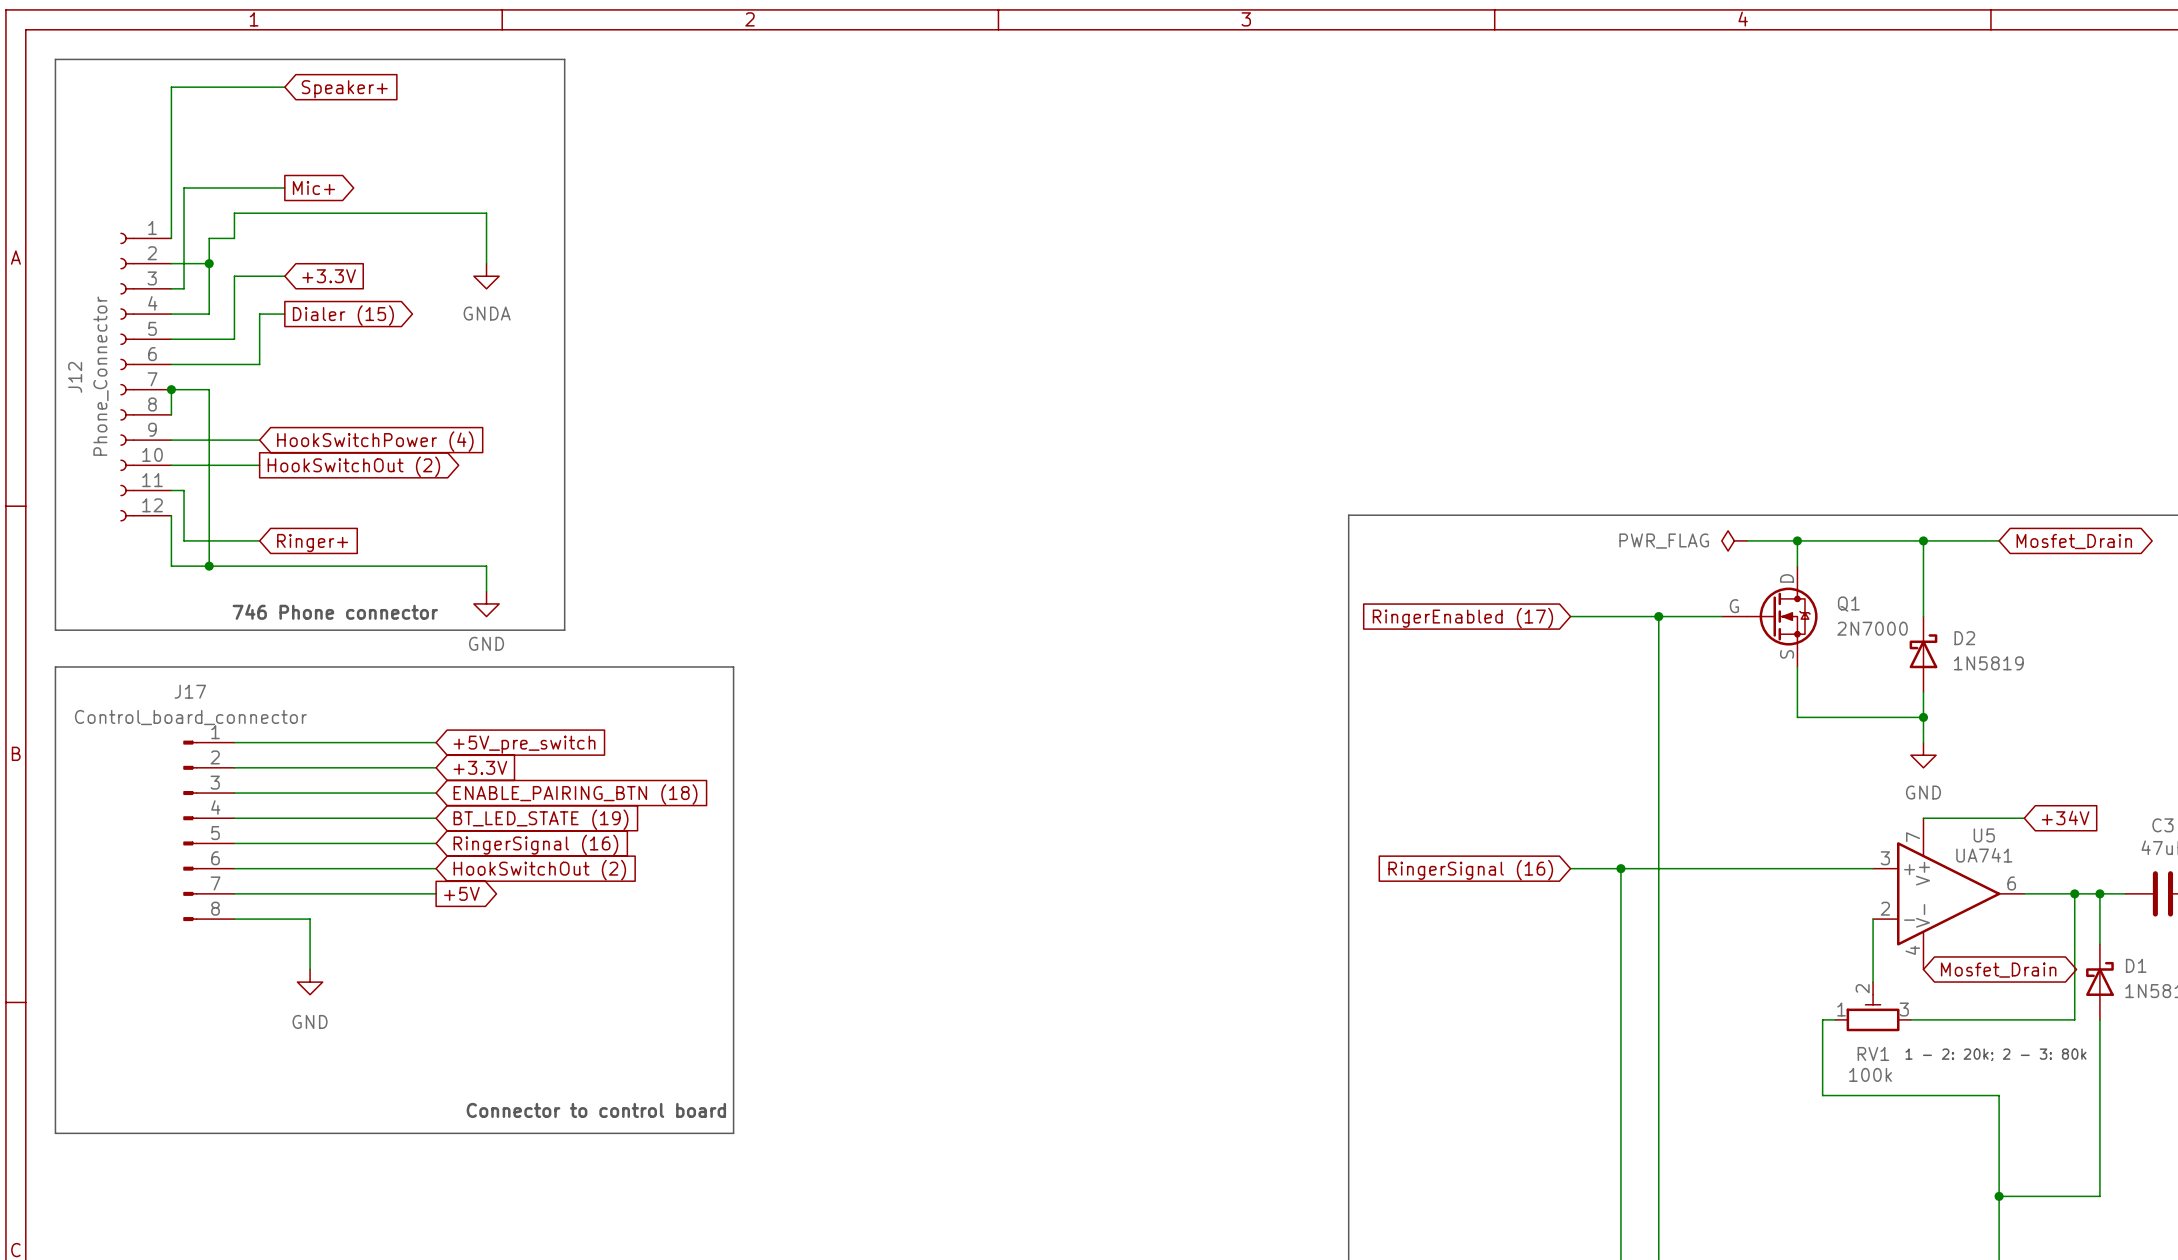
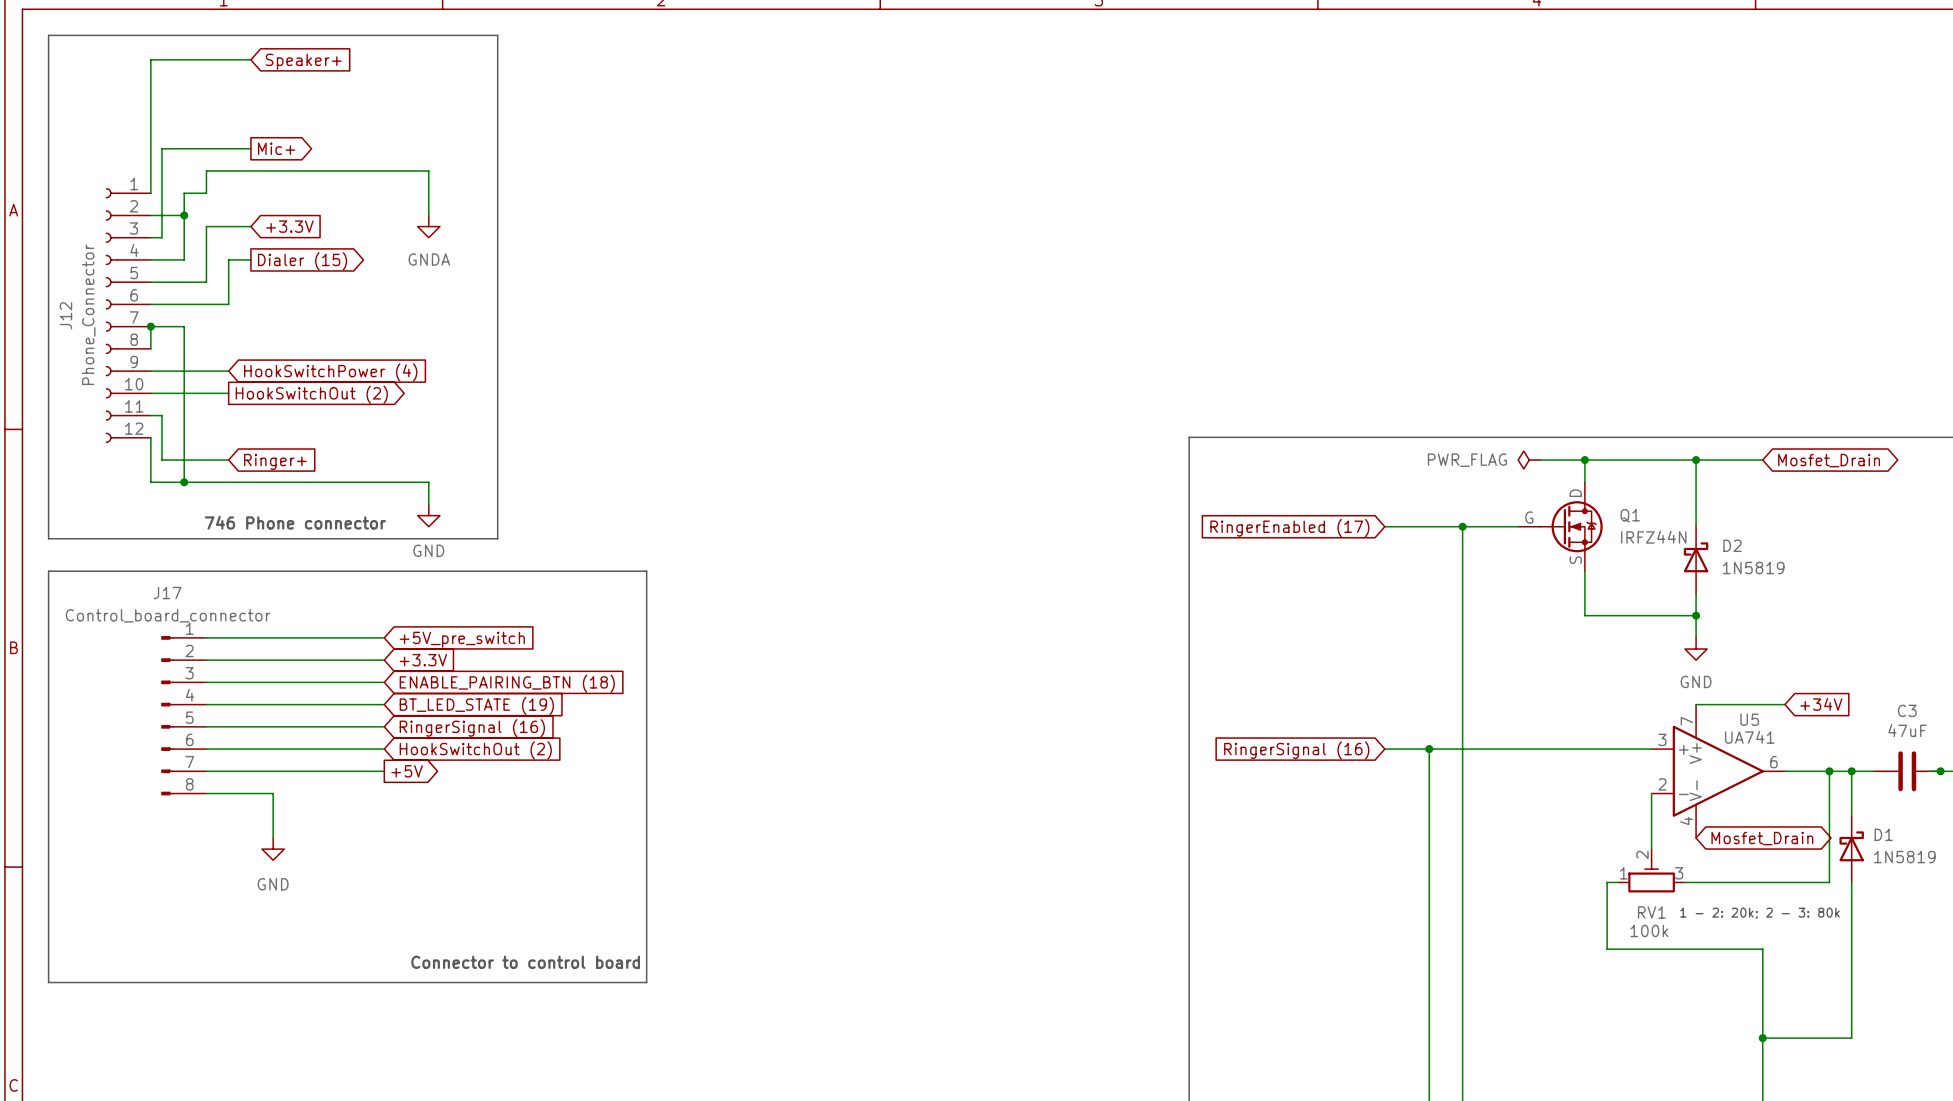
Q1 value: 2N7000 (1872, 628) -> IRFZ44N (1653, 537)

